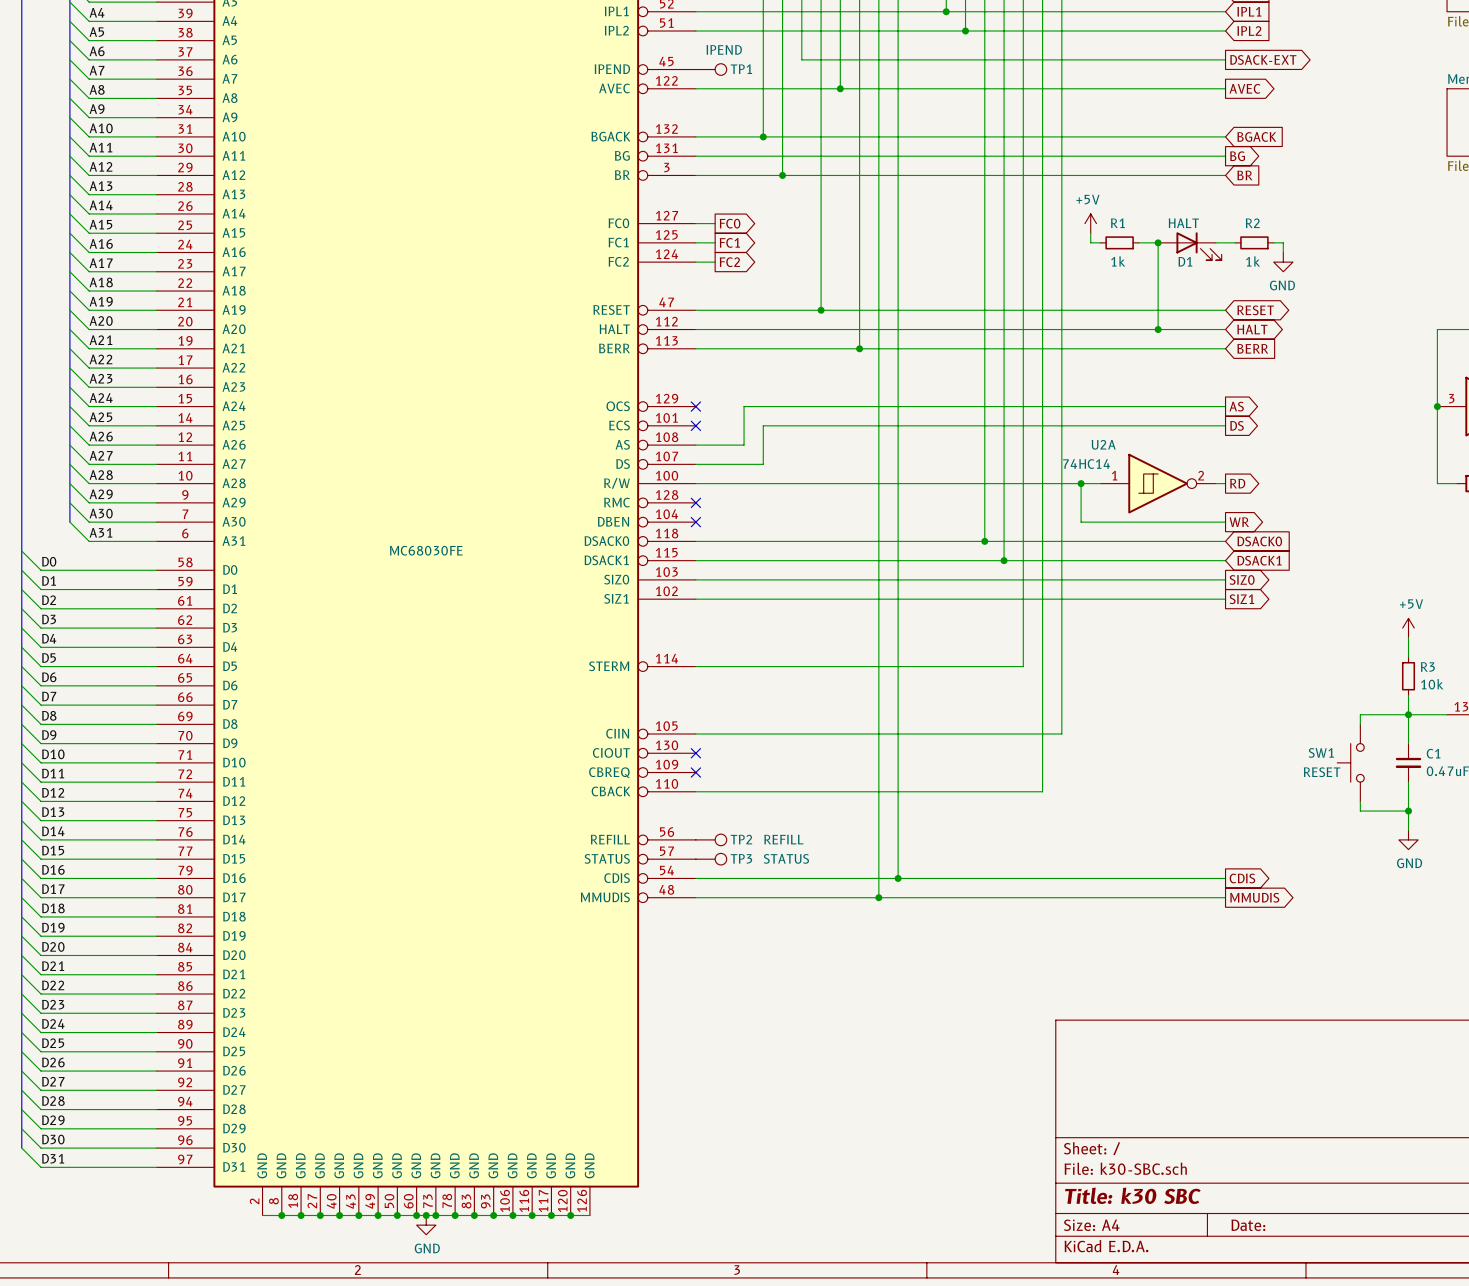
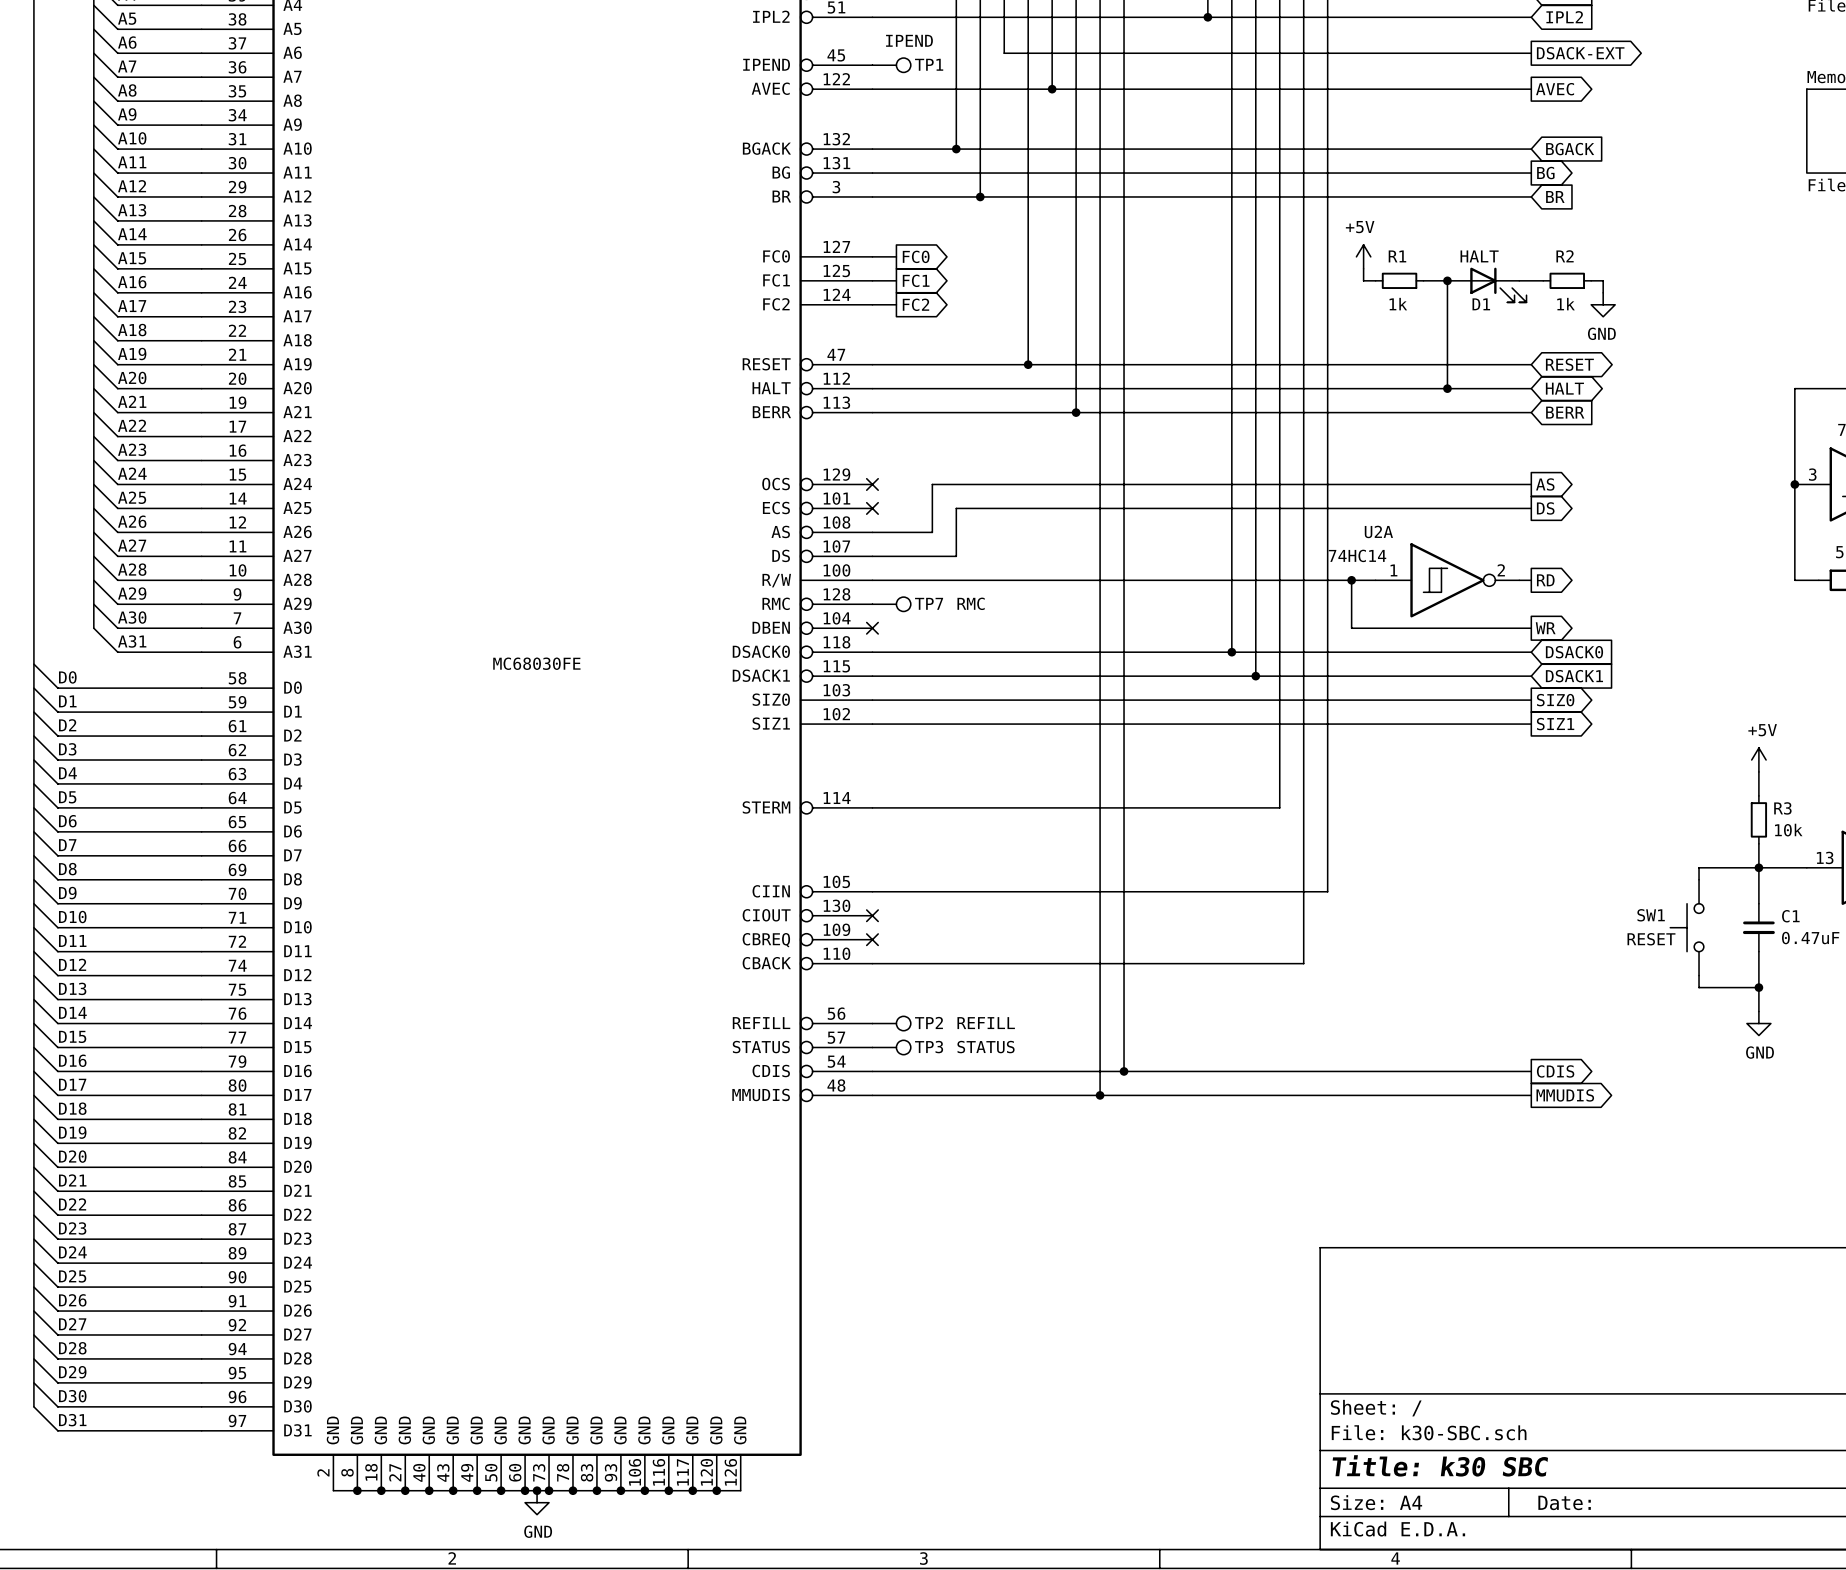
no-connect mark: (695, 502) -> none
TP7: none -> RMC (891, 604)

